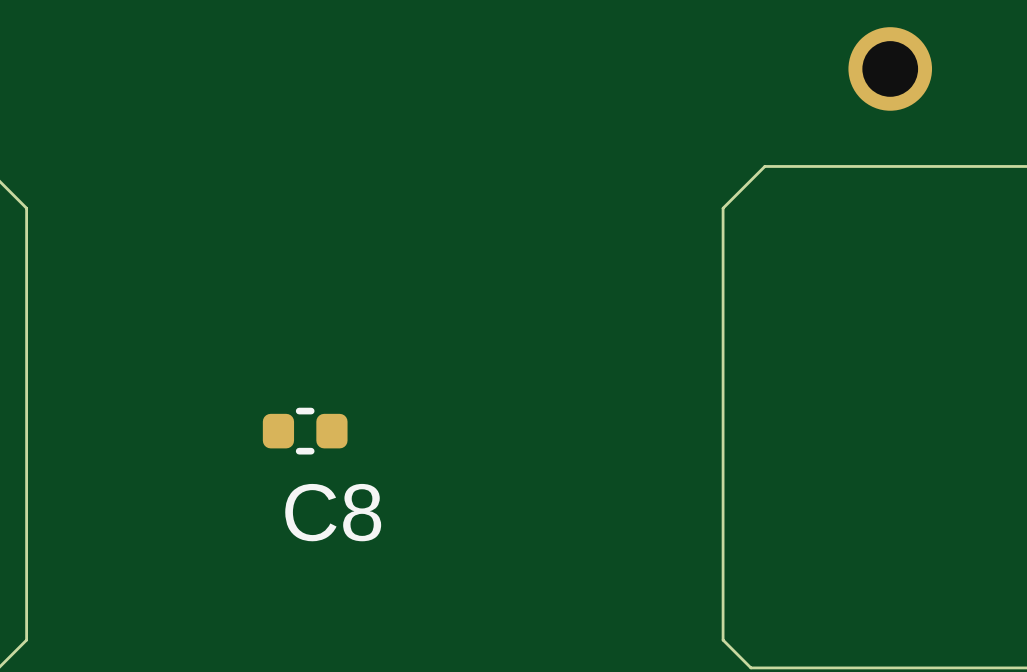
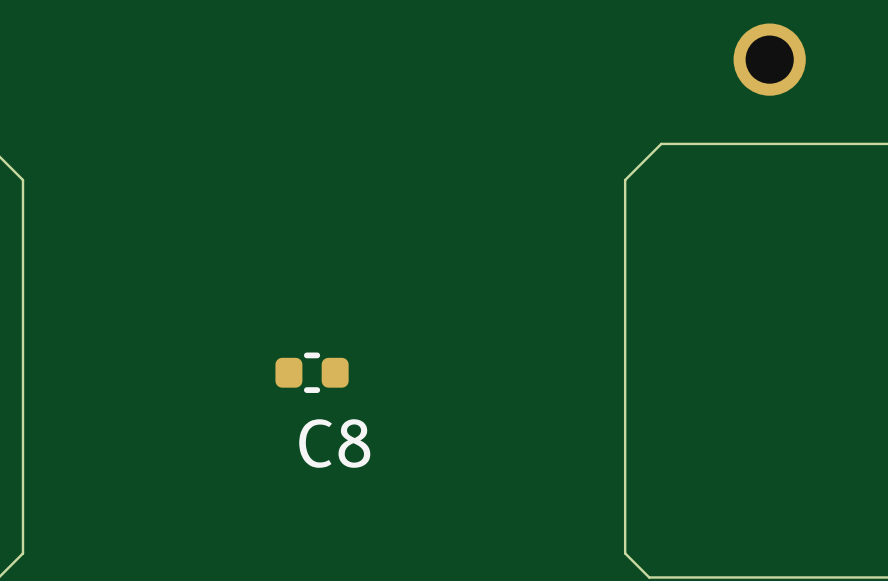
C8 position: (305, 431) -> (312, 372)

